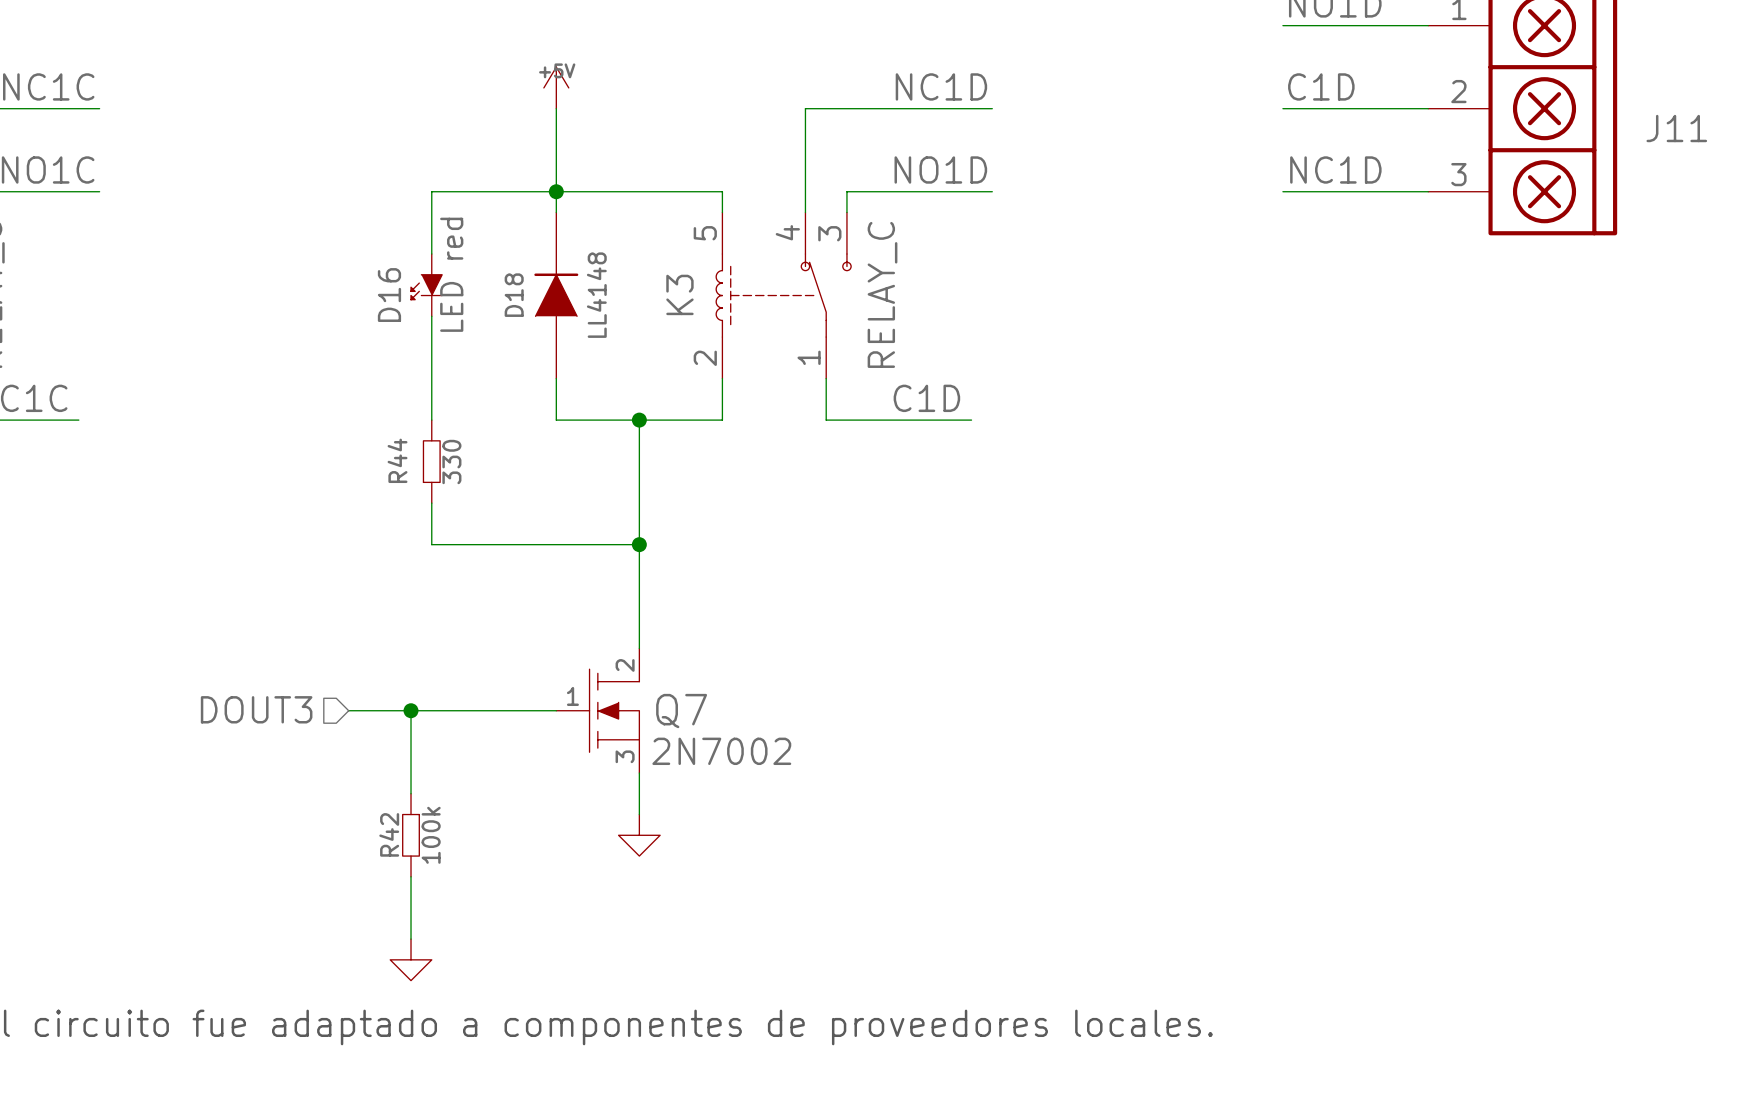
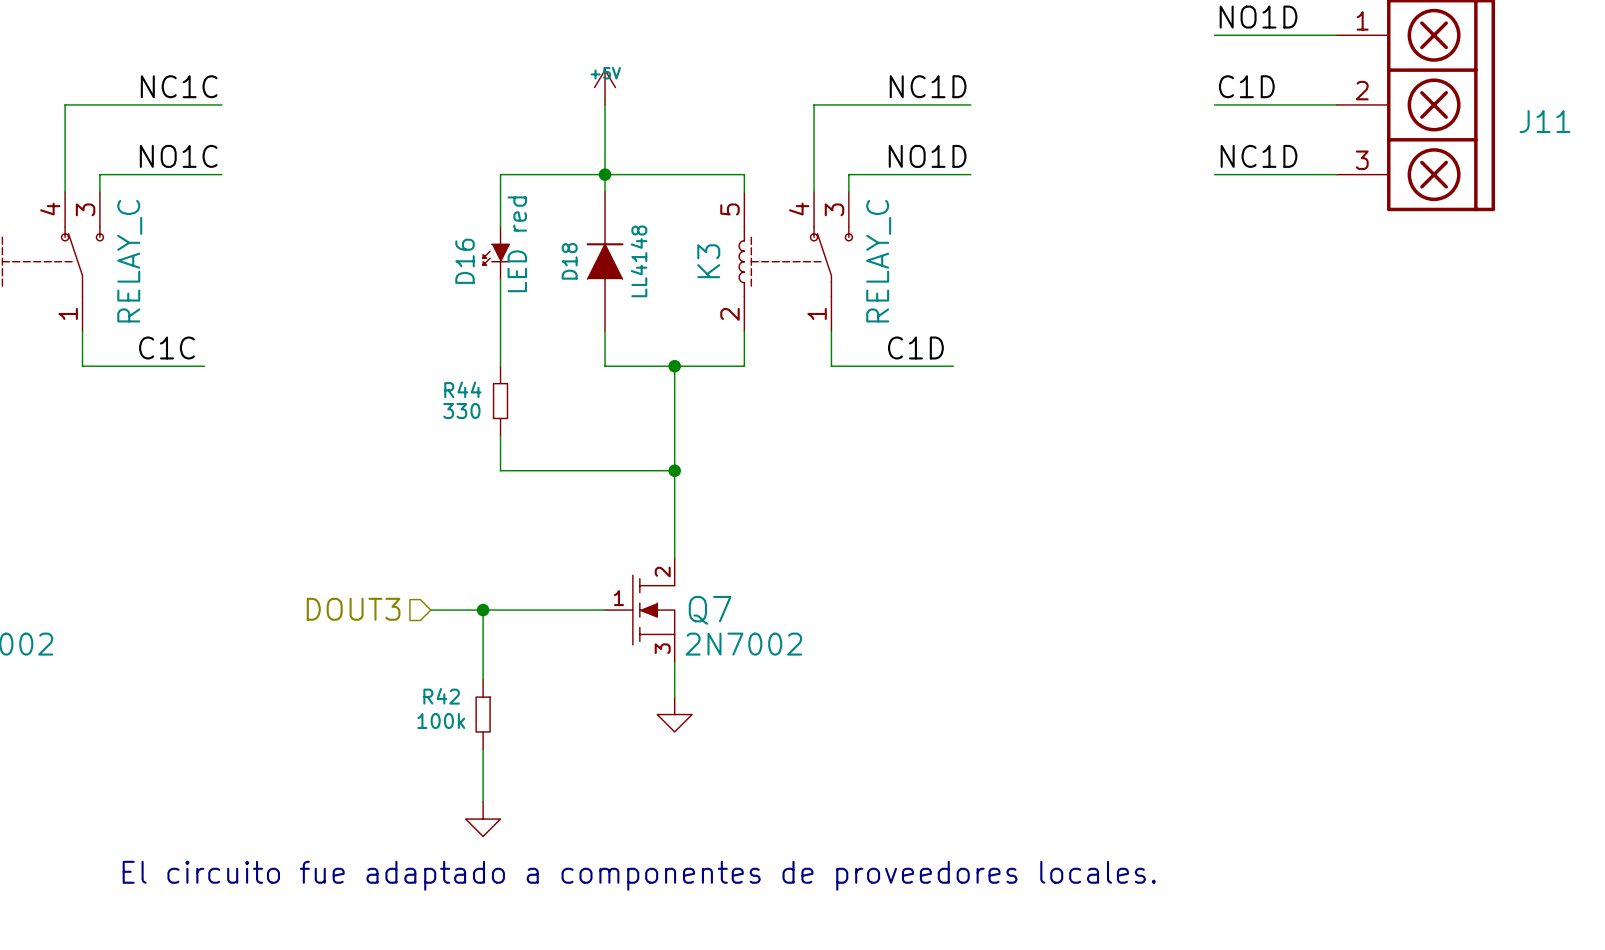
R44 name rotation: 0° (397, 460) -> 90° clockwise (462, 389)
R44 value rotation: 0° (451, 462) -> 90° clockwise (461, 410)
R44 value position: 330 (451, 462) -> 330 (461, 410)
R42 name rotation: 0° (389, 834) -> 90° clockwise (441, 696)
R42 value rotation: 0° (431, 835) -> 90° clockwise (441, 721)

